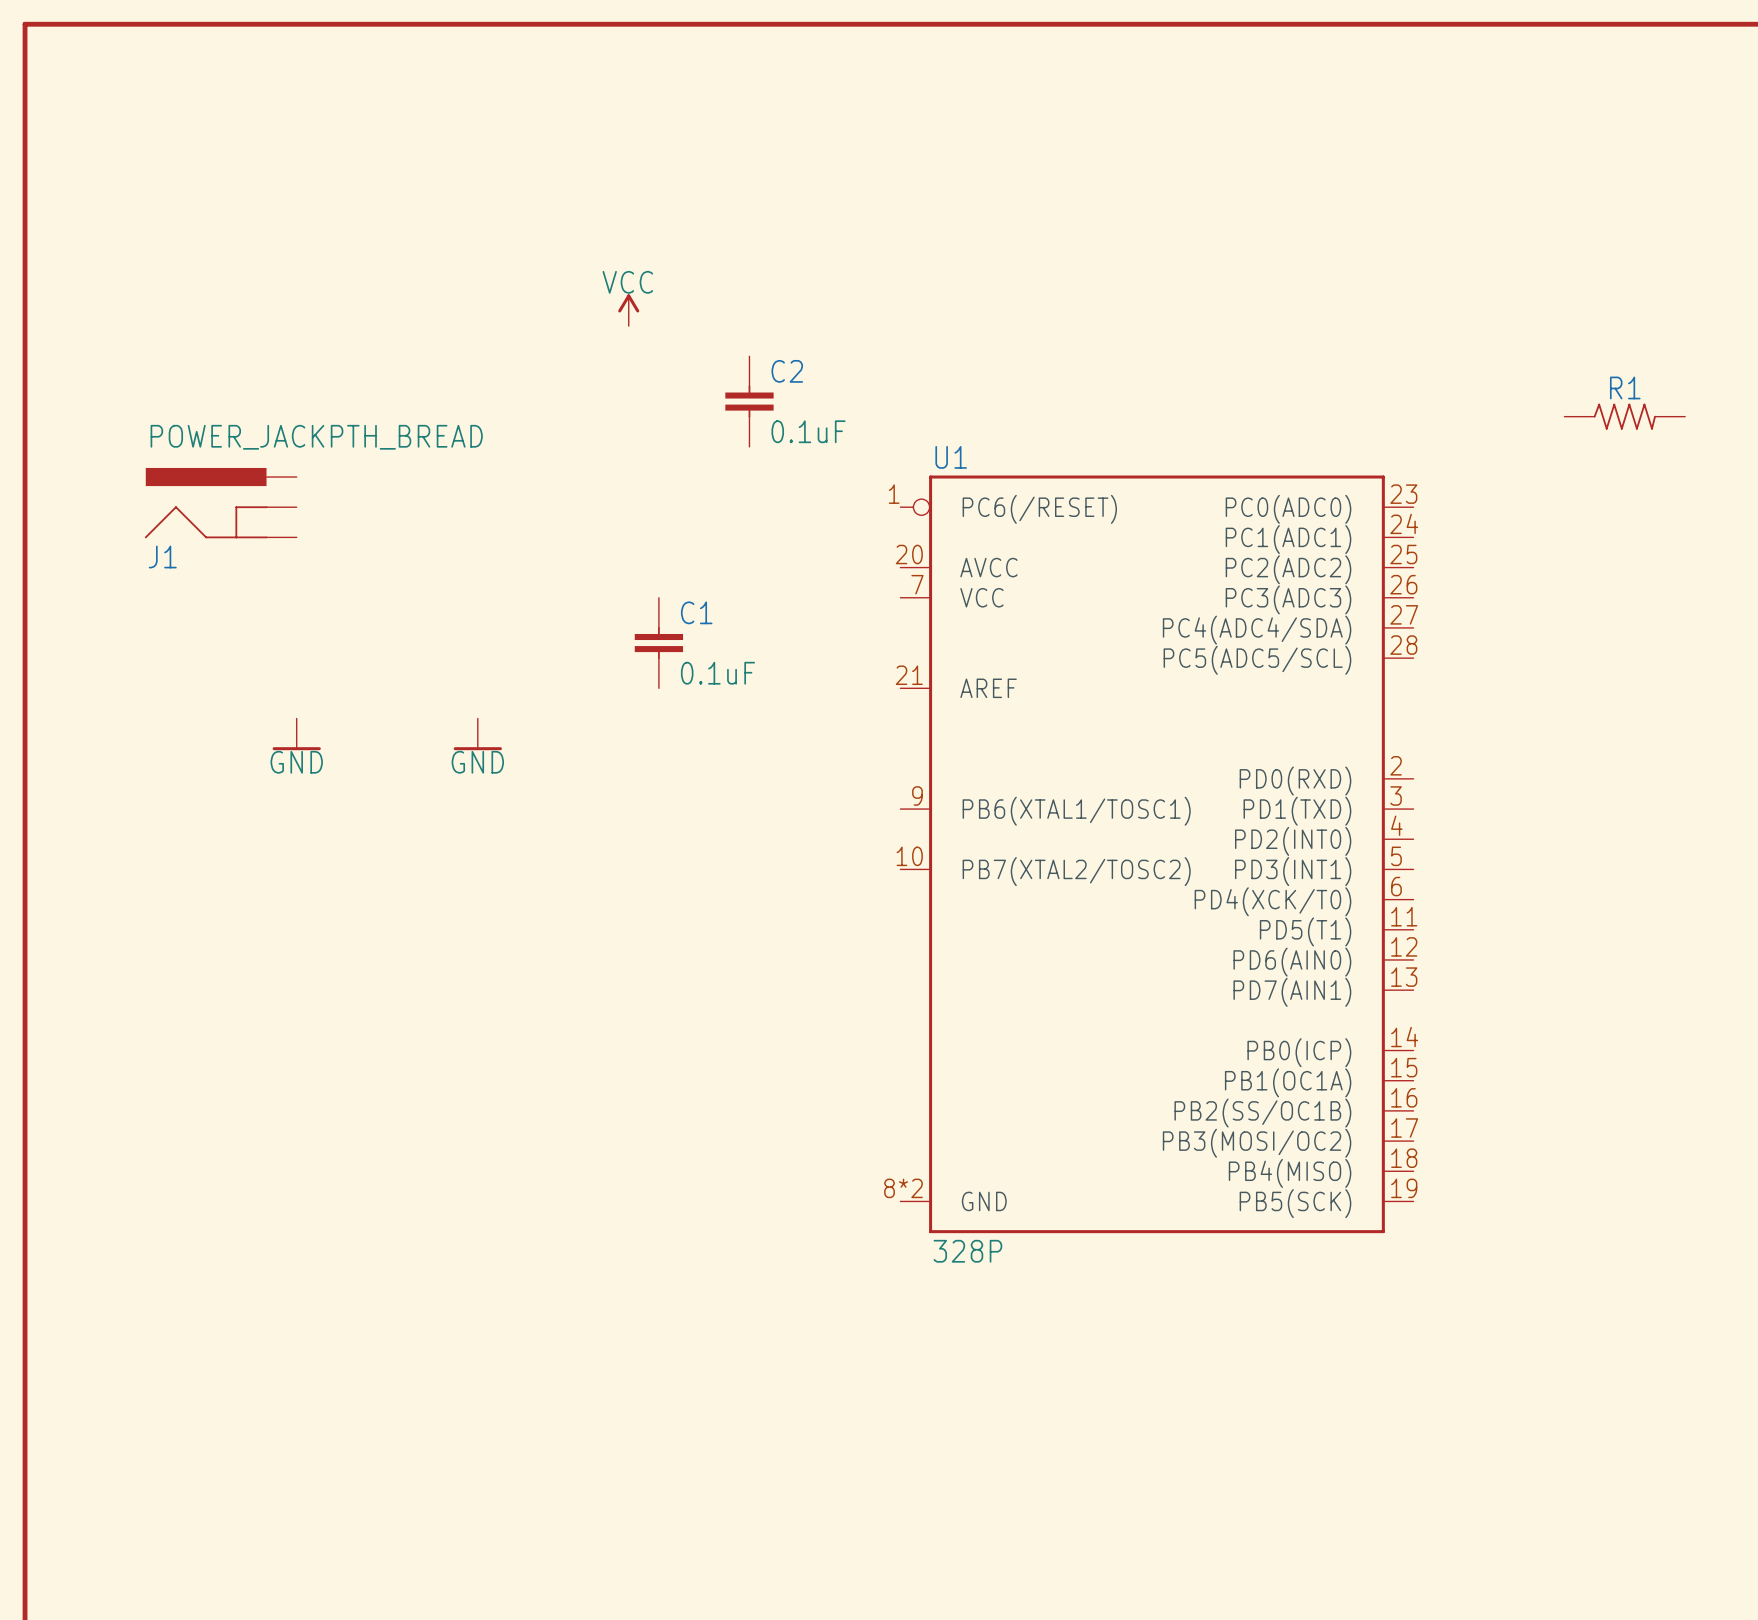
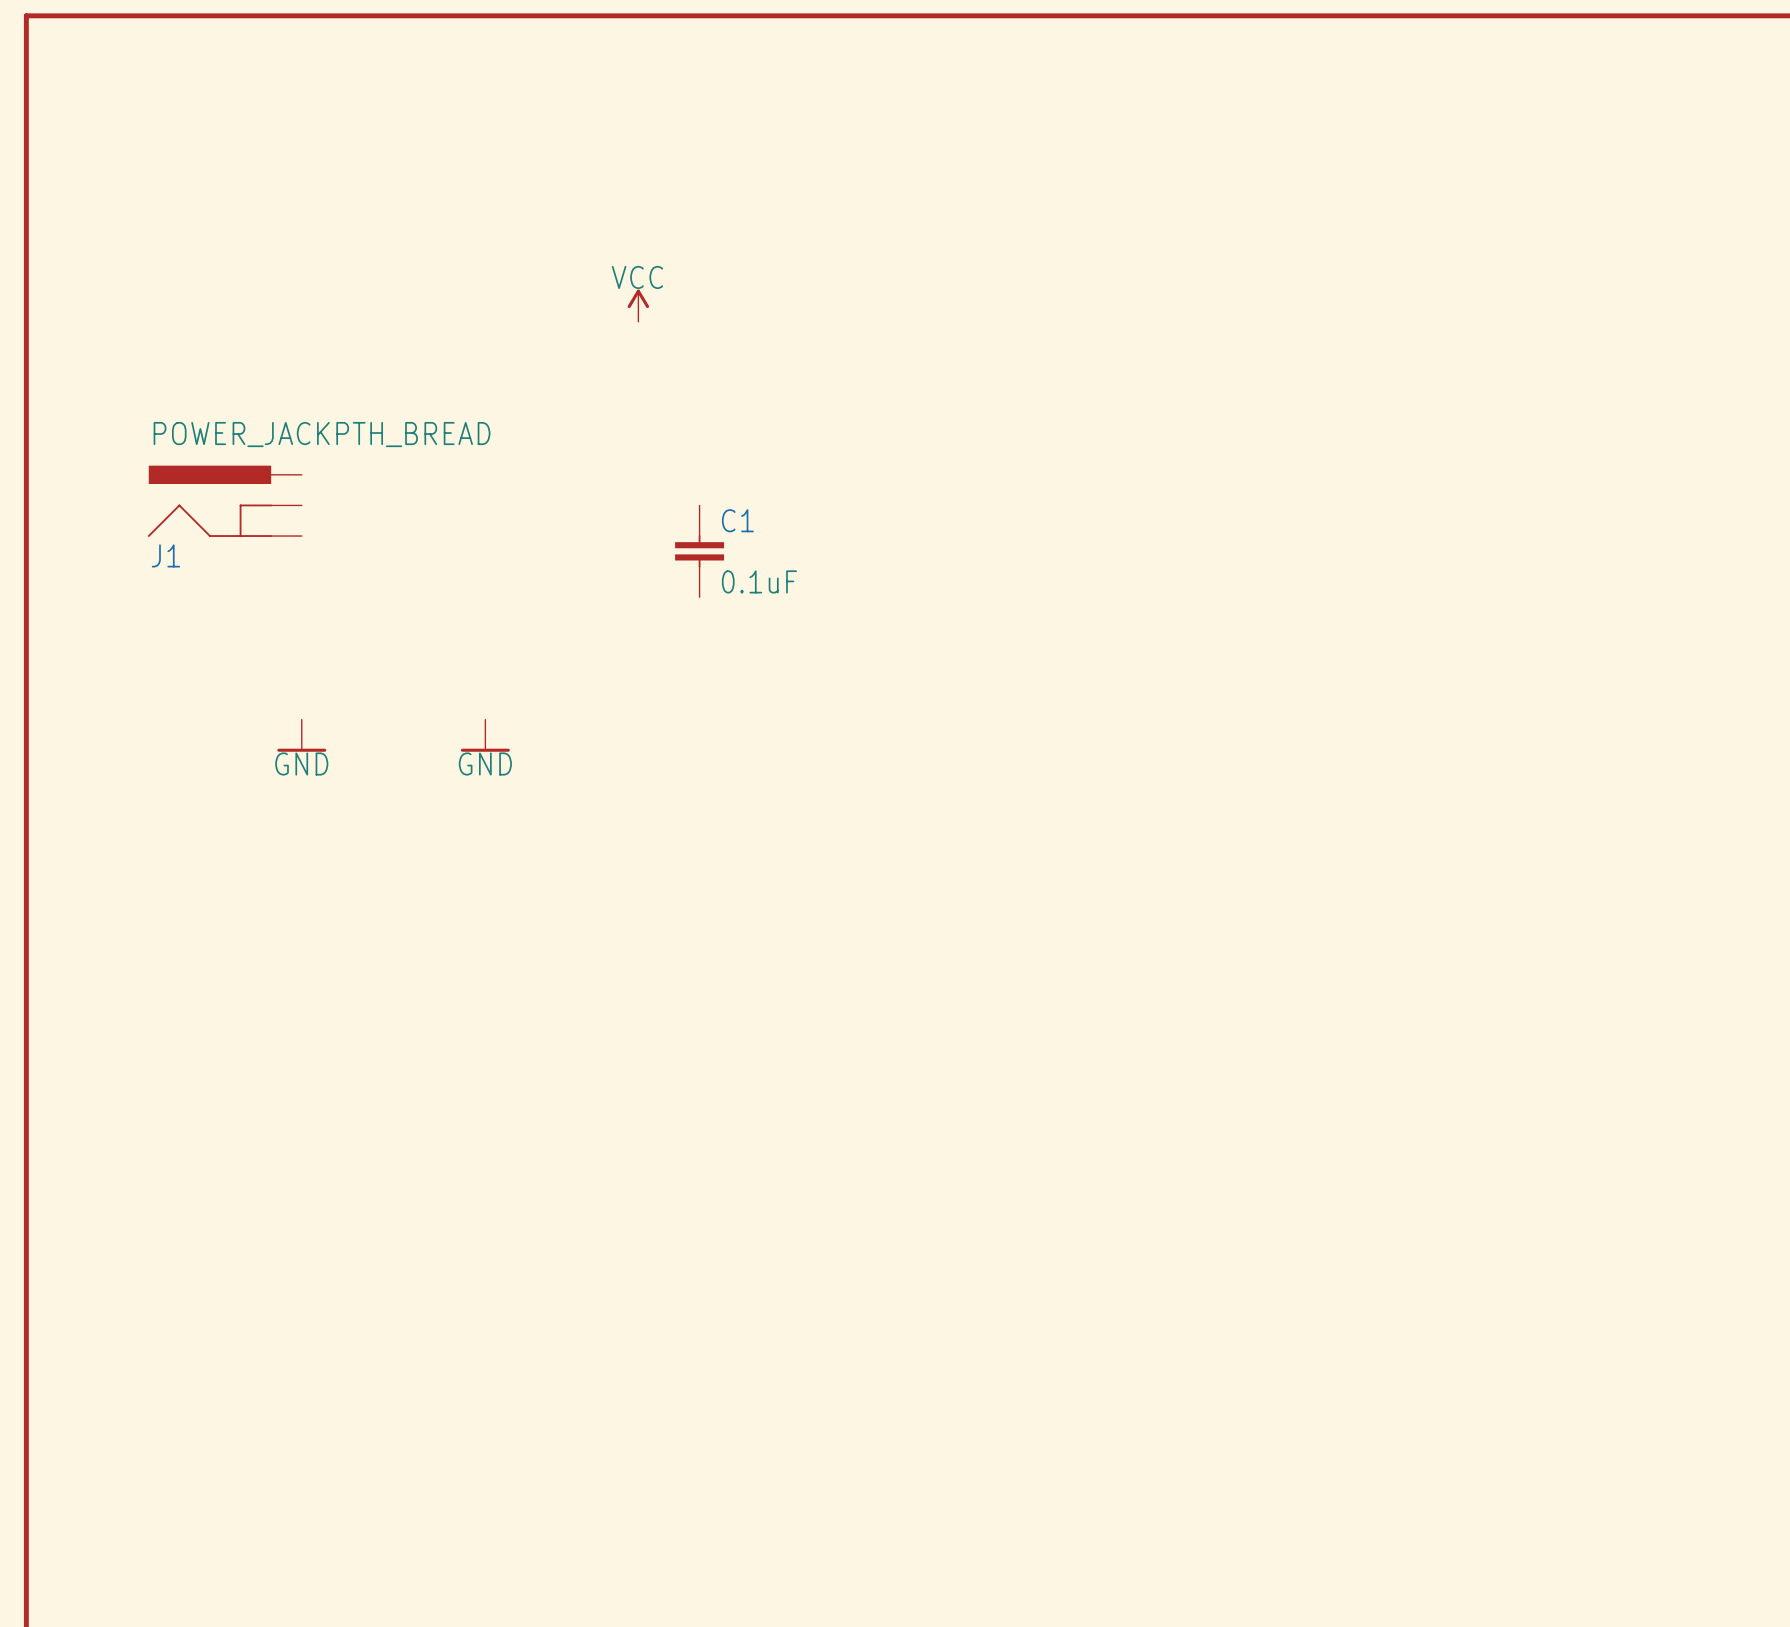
C2: 0.1uF (749, 401) -> none
R1: (1624, 416) -> none
C1 position: (658, 643) -> (699, 551)
U1: 328P (1156, 854) -> none

